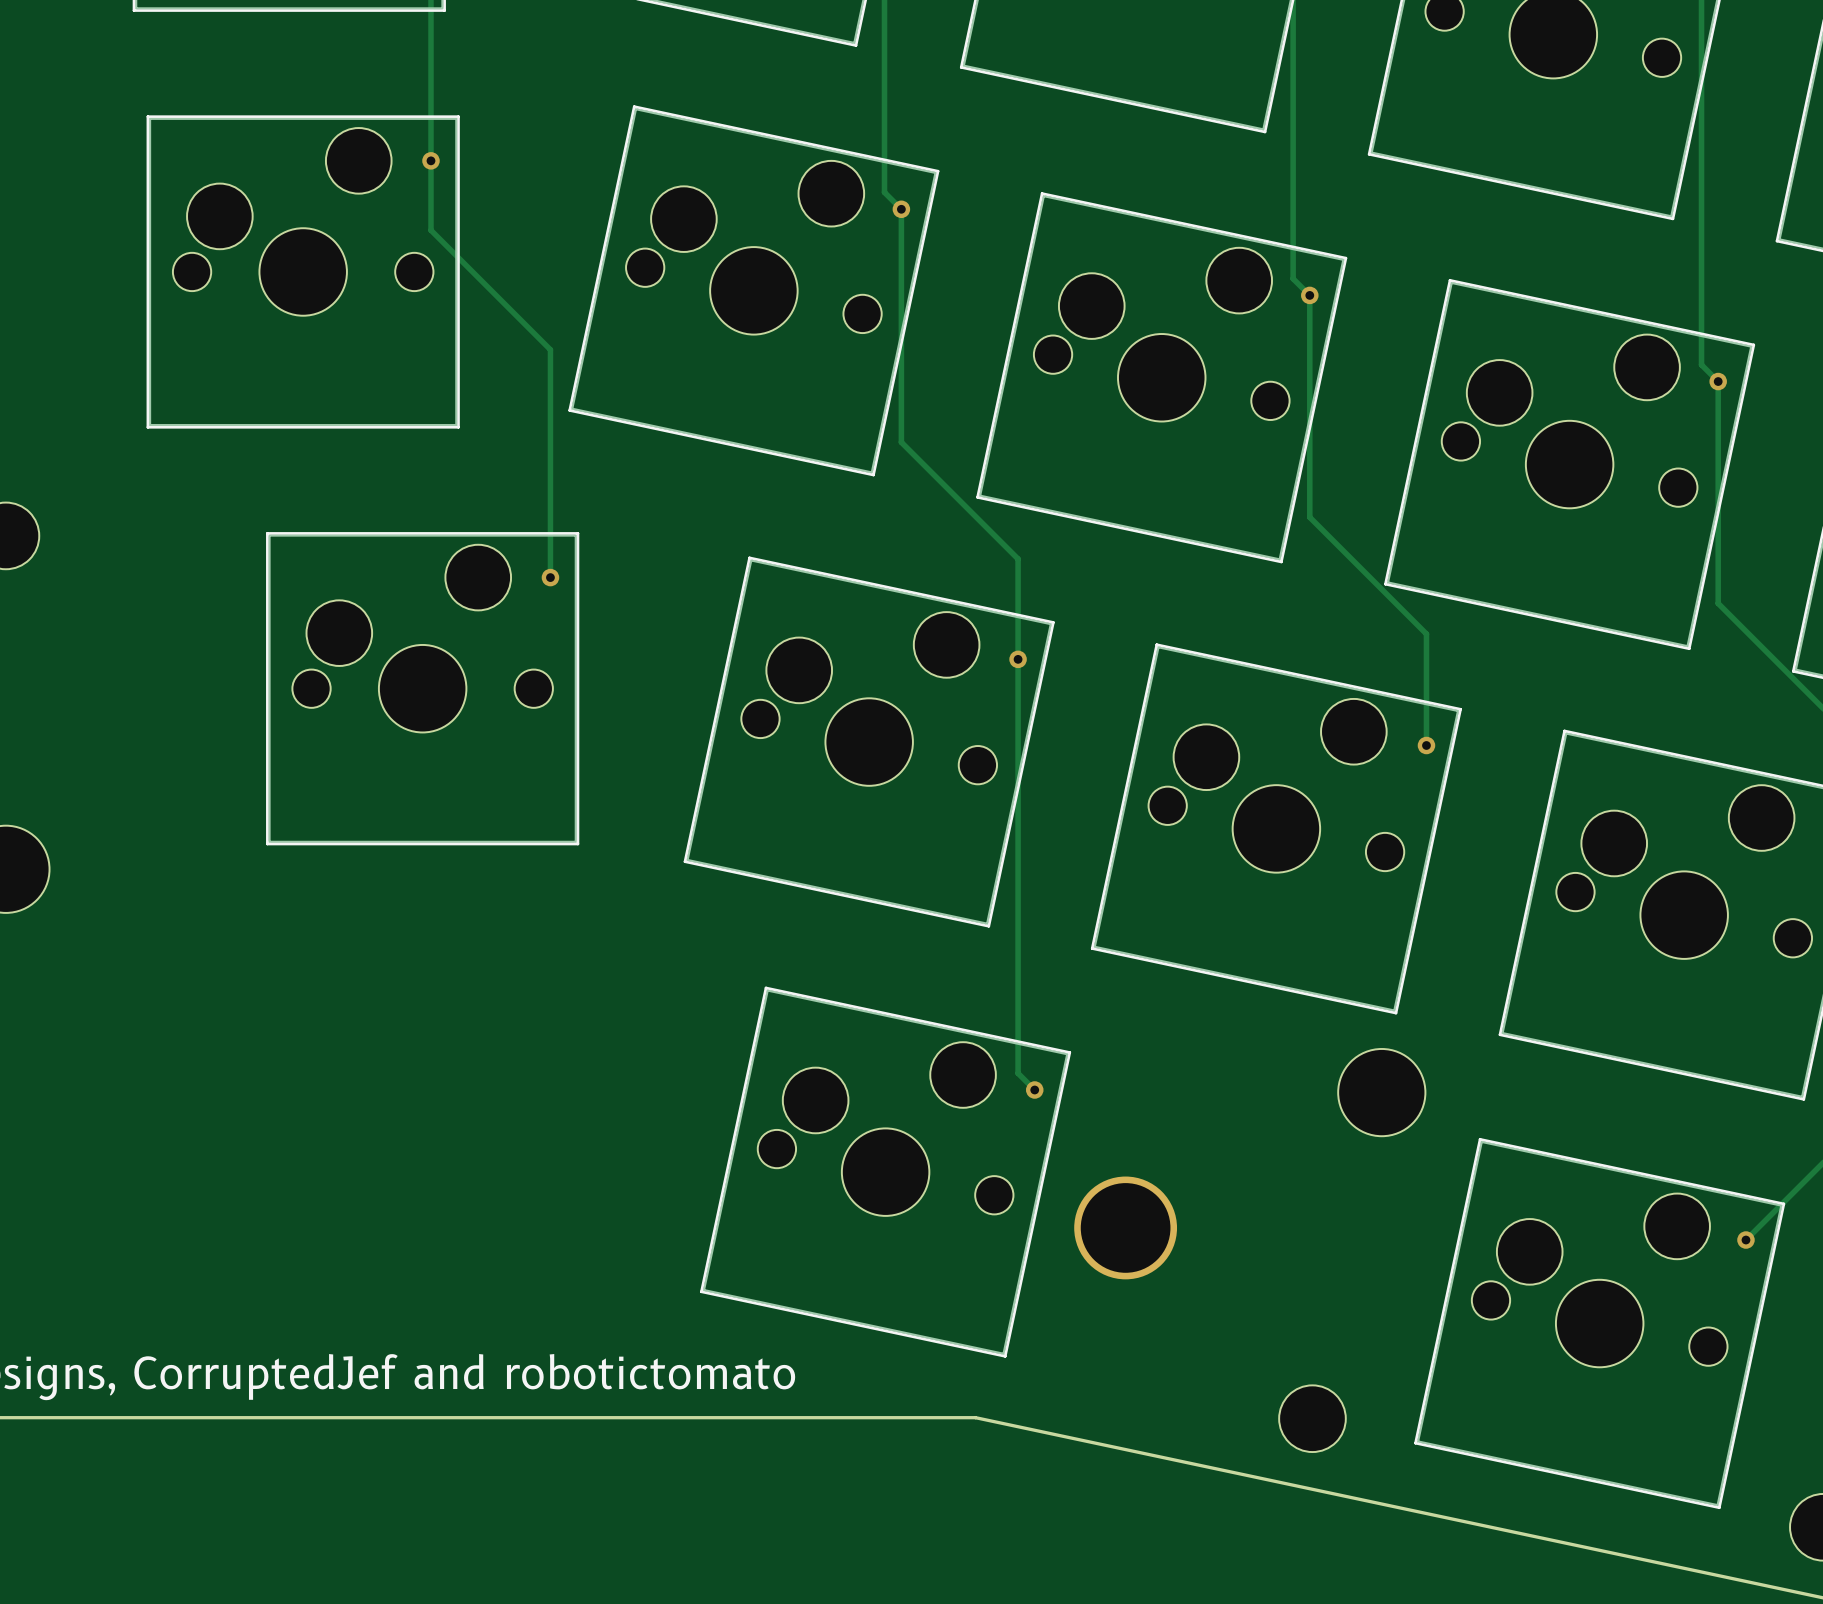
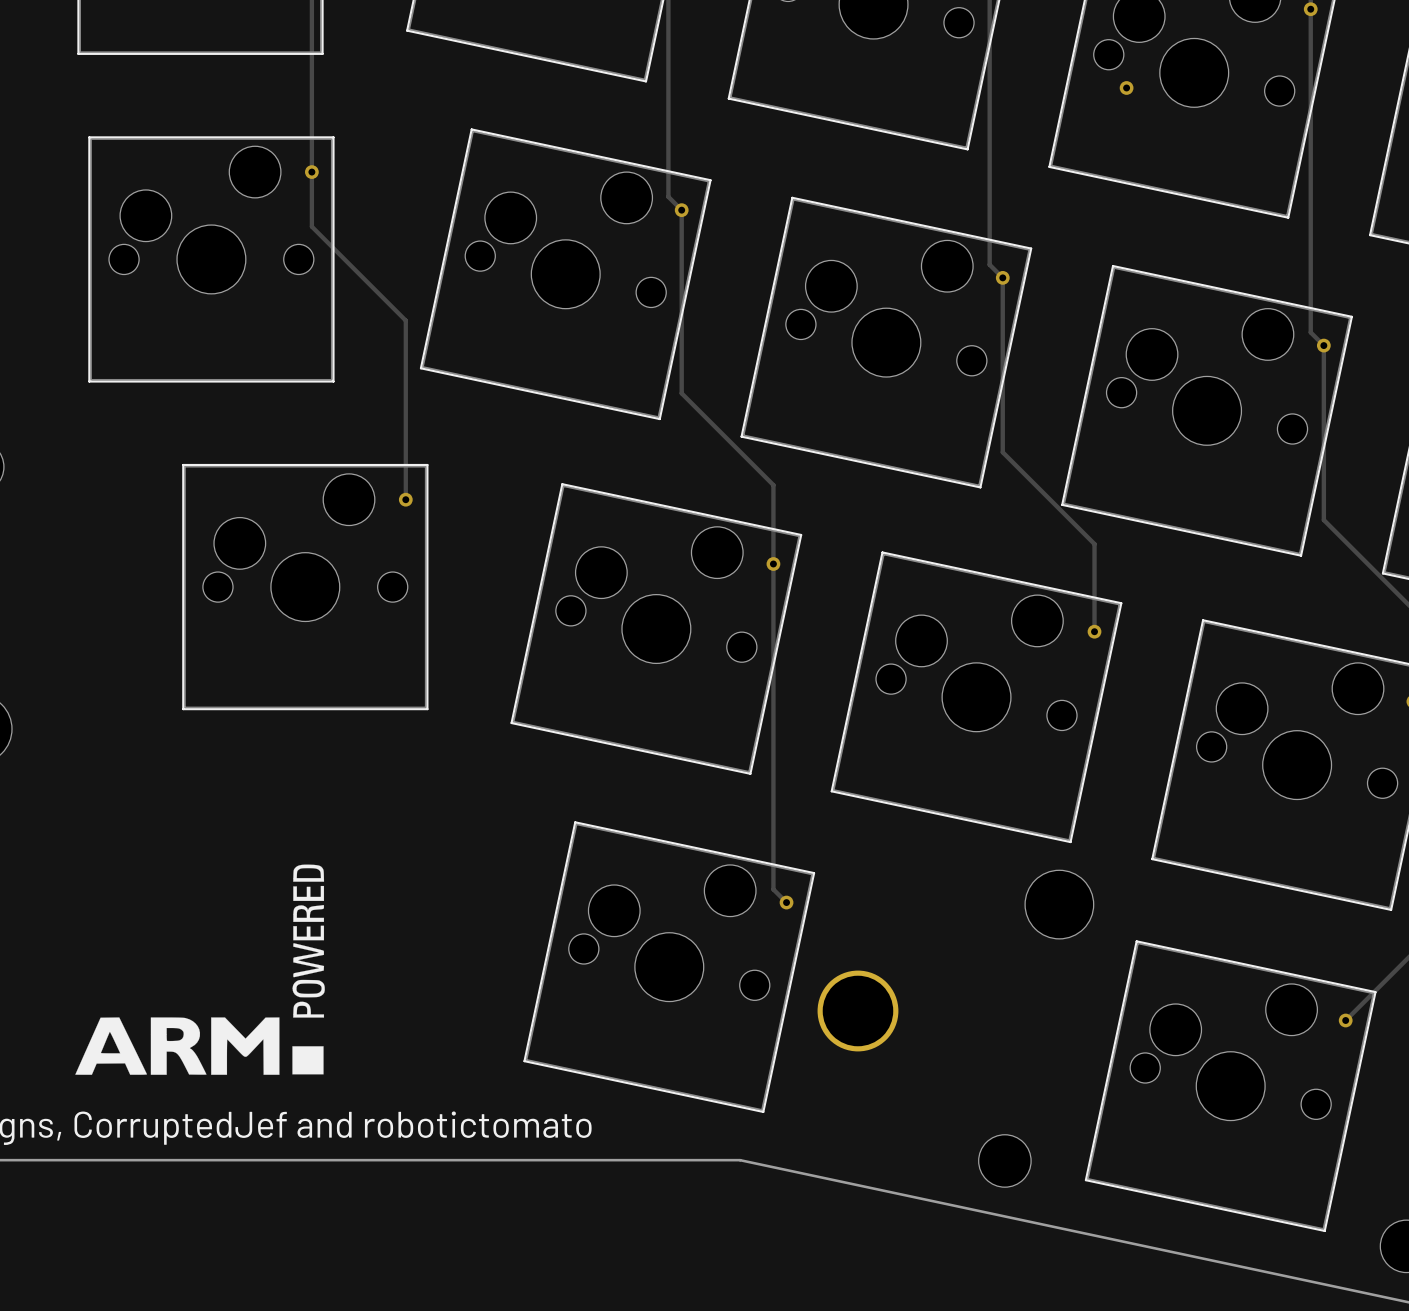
via: none -> (1126, 87)
drawing: none -> [75, 864, 325, 1075]

